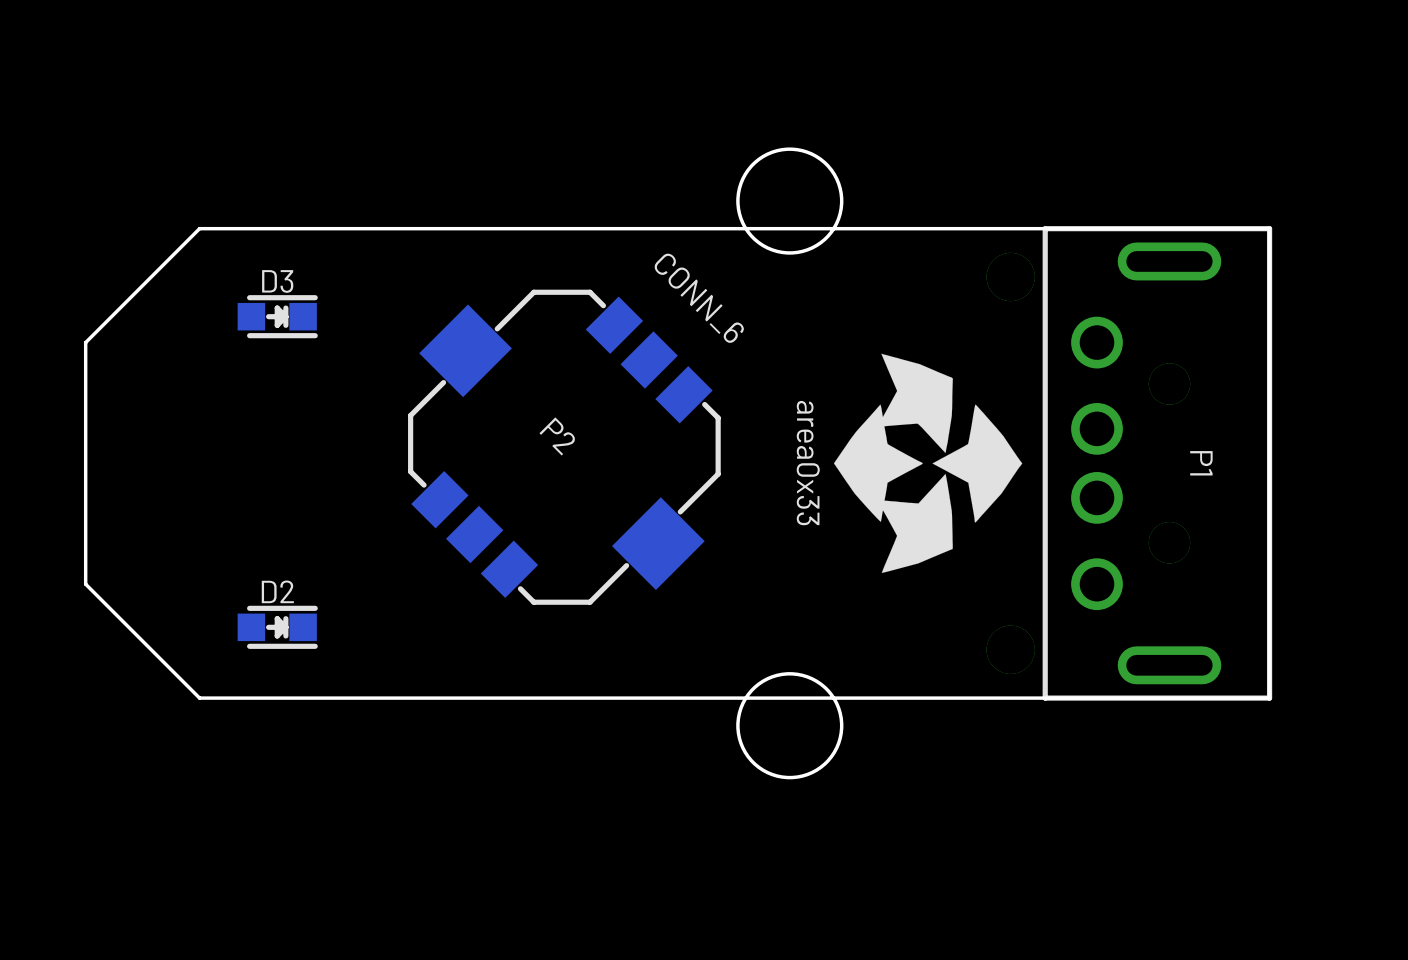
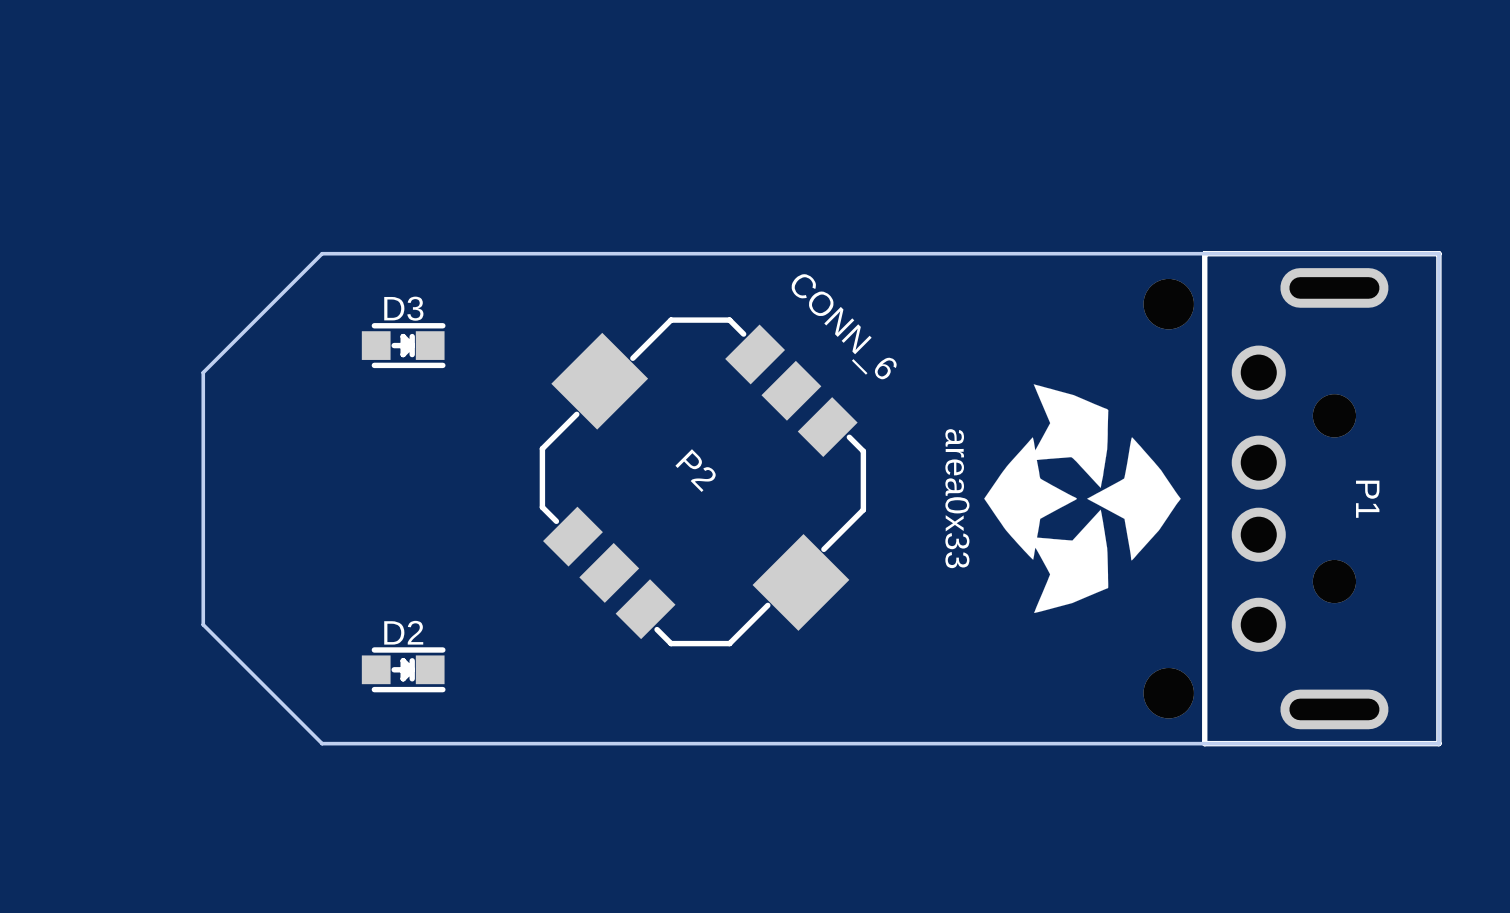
round board edge: [736, 147, 844, 255] -> none
round board edge: [736, 672, 844, 780] -> none

